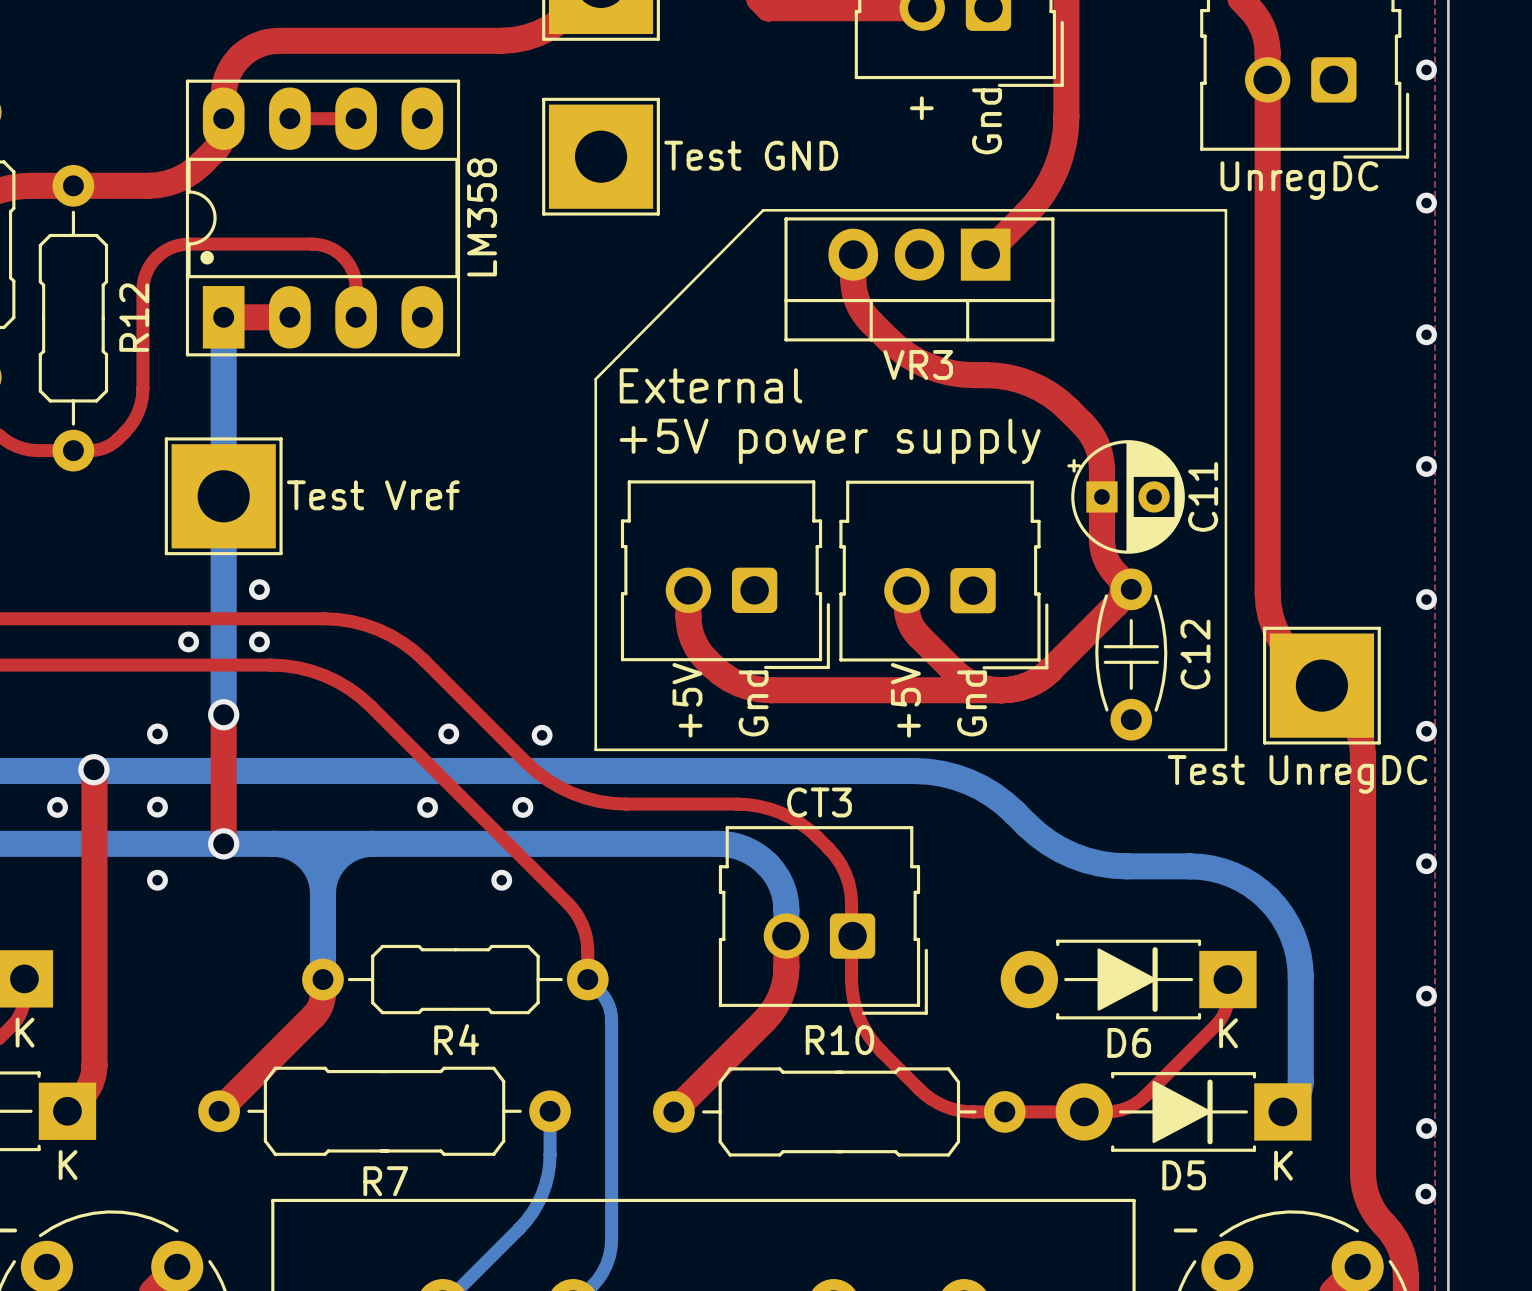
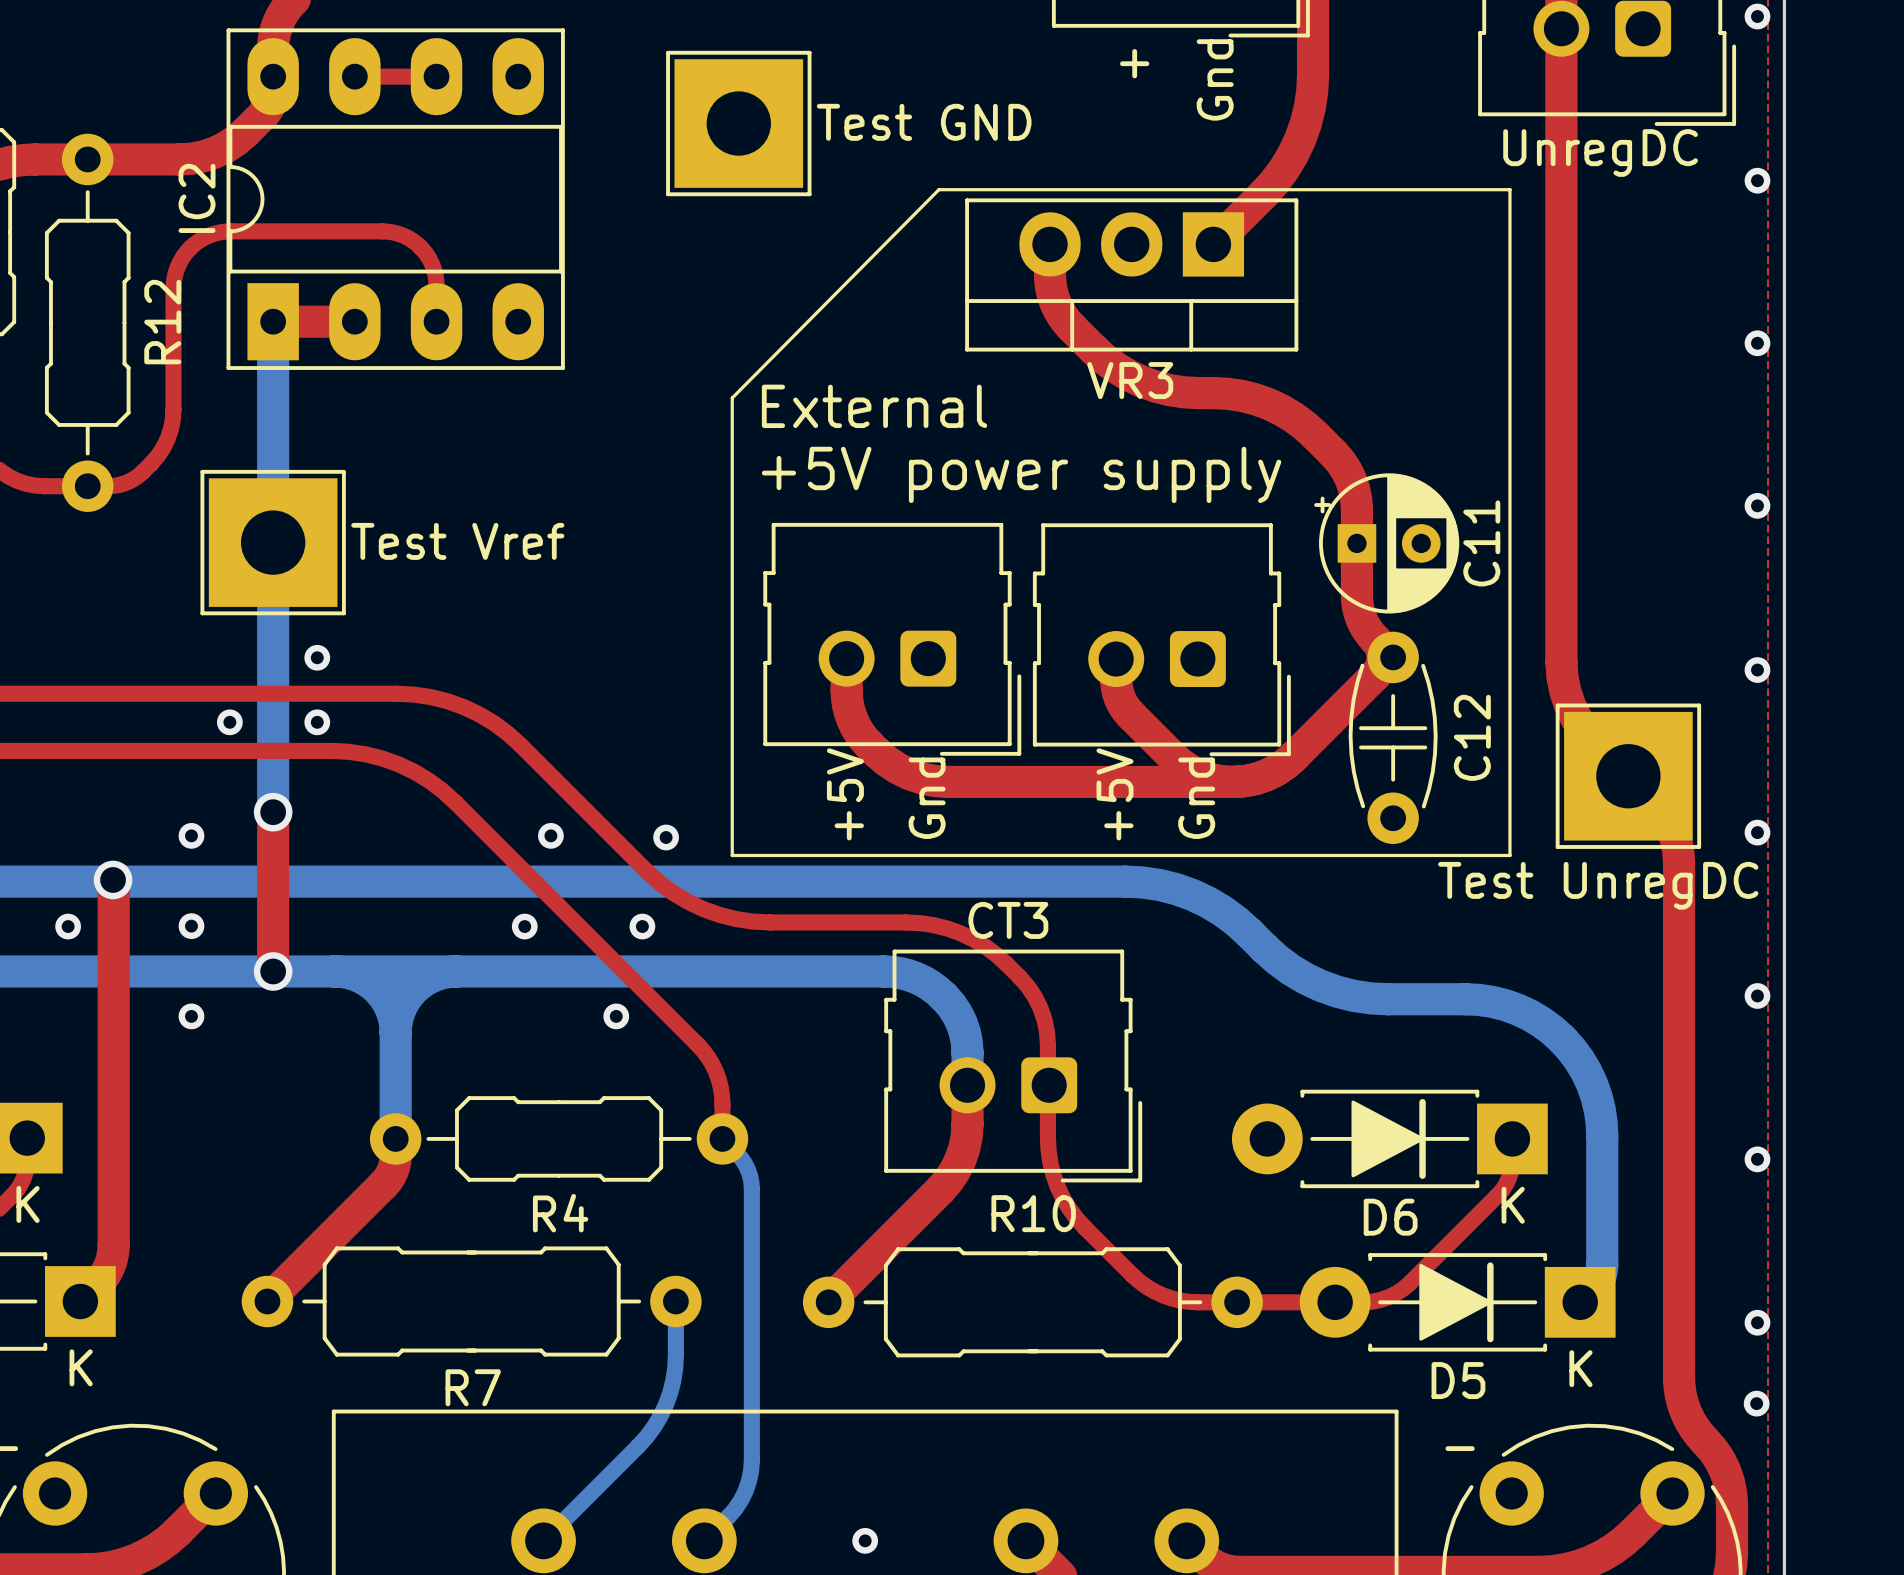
part: LM358 (322, 218) -> none
IC2: none -> (395, 199)

